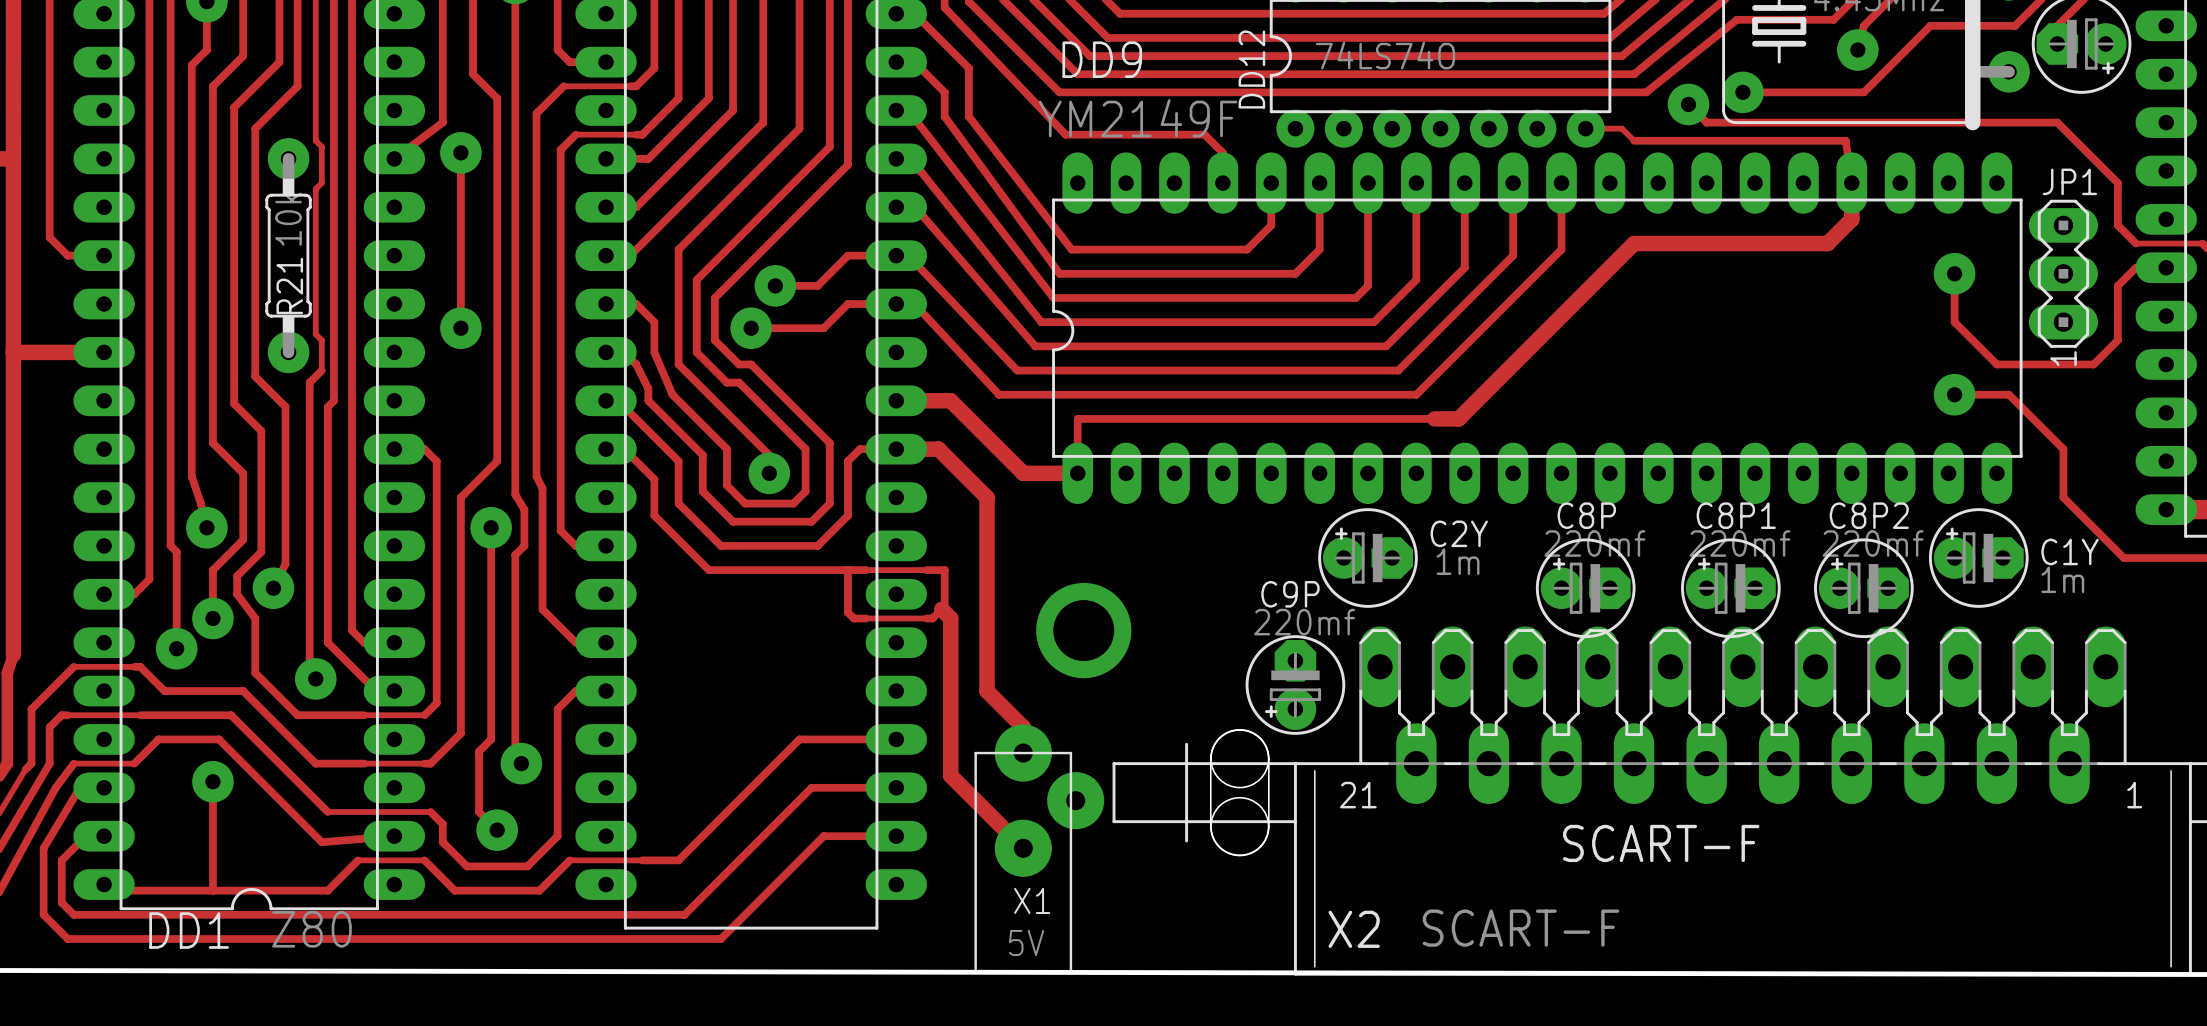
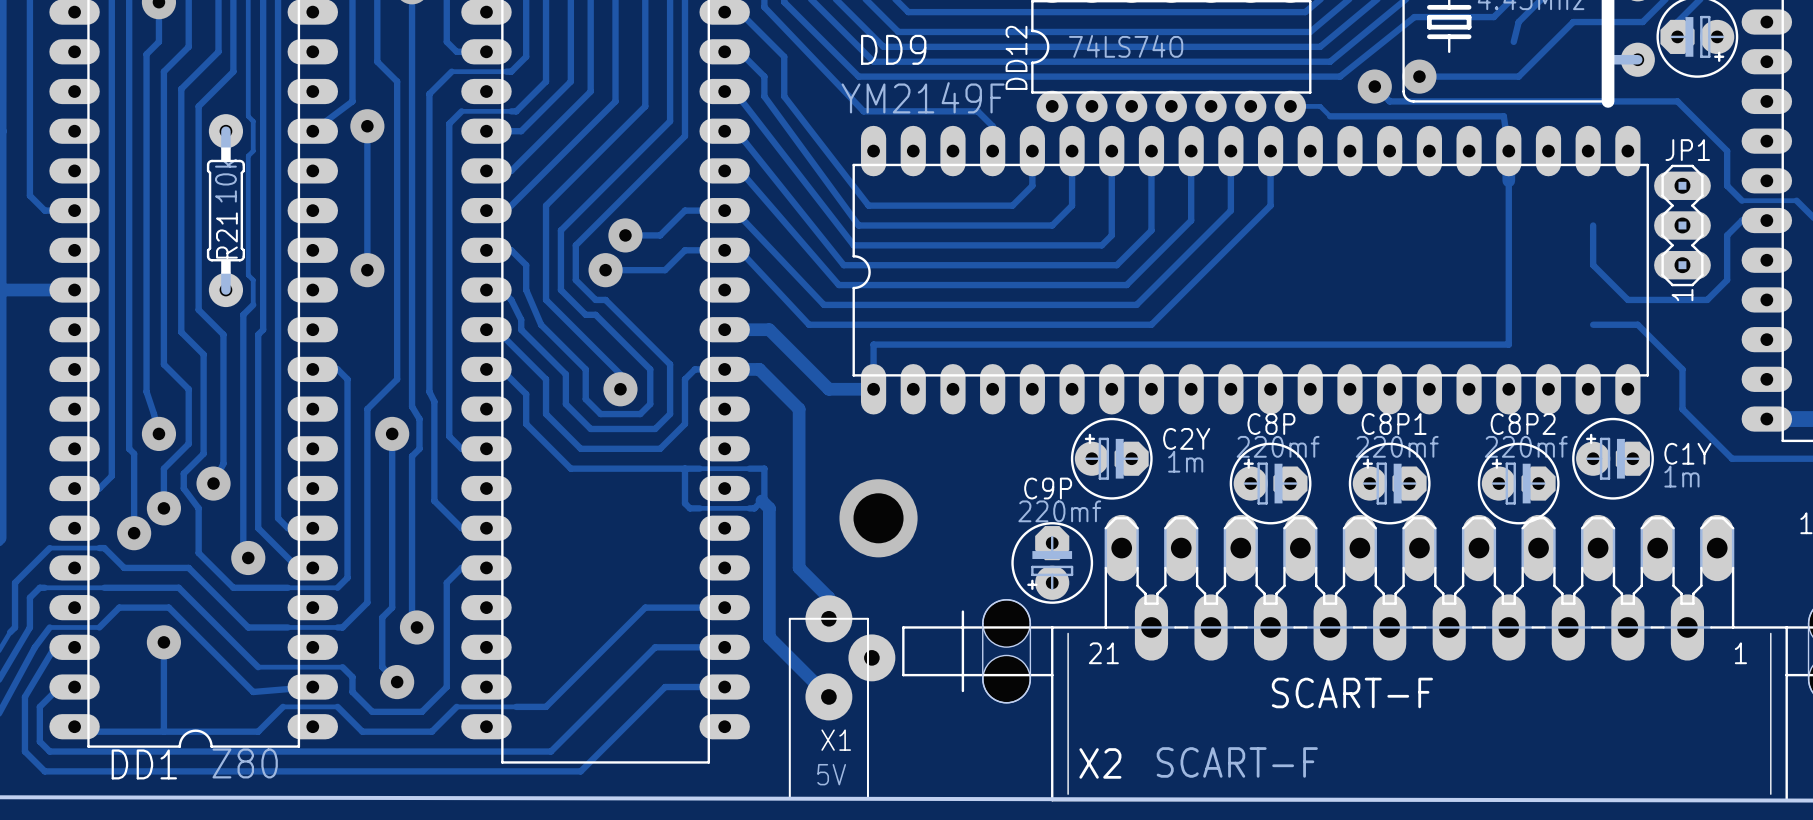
via: (1857, 50) -> none
track: (1851, 219) (1827, 243) (1634, 243) (1458, 418) -> (1508, 180) (1508, 344) (1186, 344)
via: (1954, 273) -> none
via: (1954, 394) -> none
track width: thick (1434, 418) (1458, 418) -> thin (1166, 344) (1186, 344)
C8P position: (1585, 588) -> (1270, 483)
C8P1 position: (1730, 588) -> (1389, 483)

